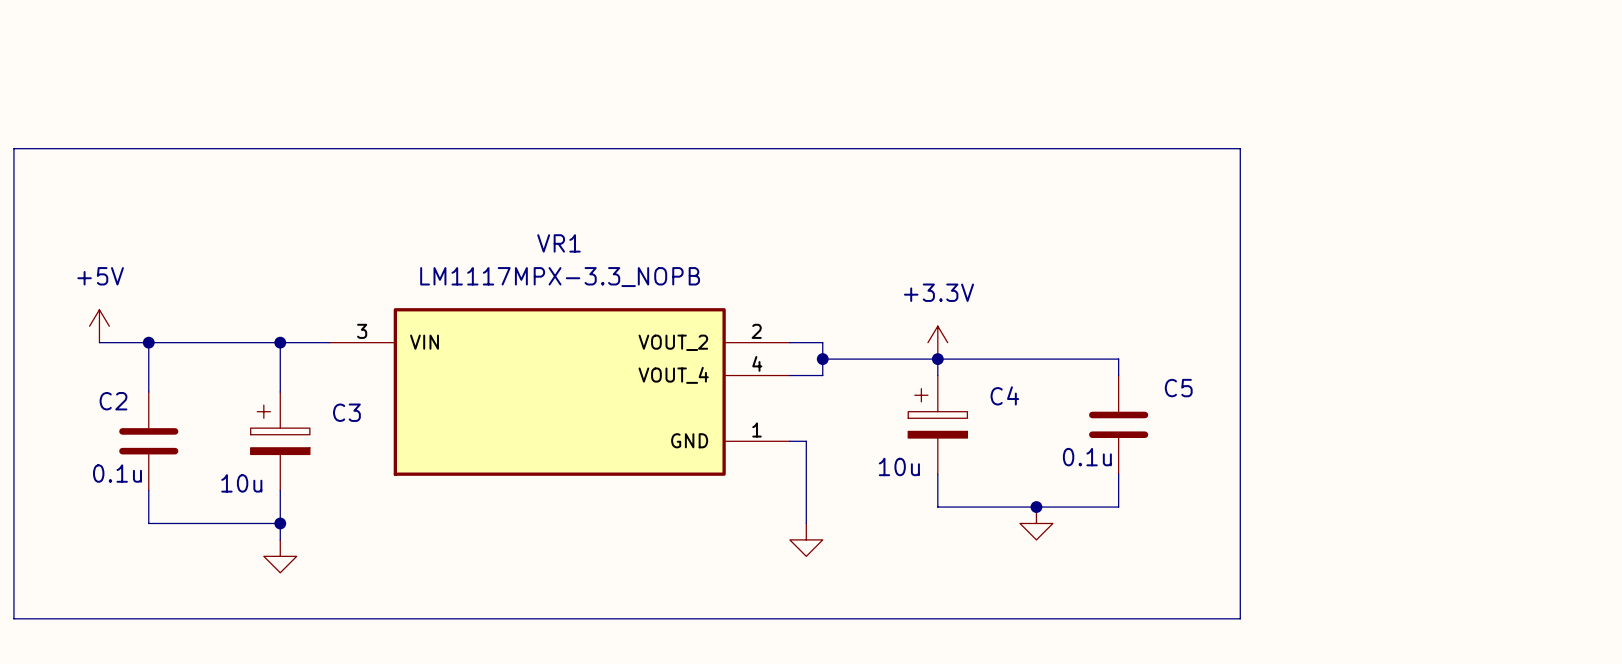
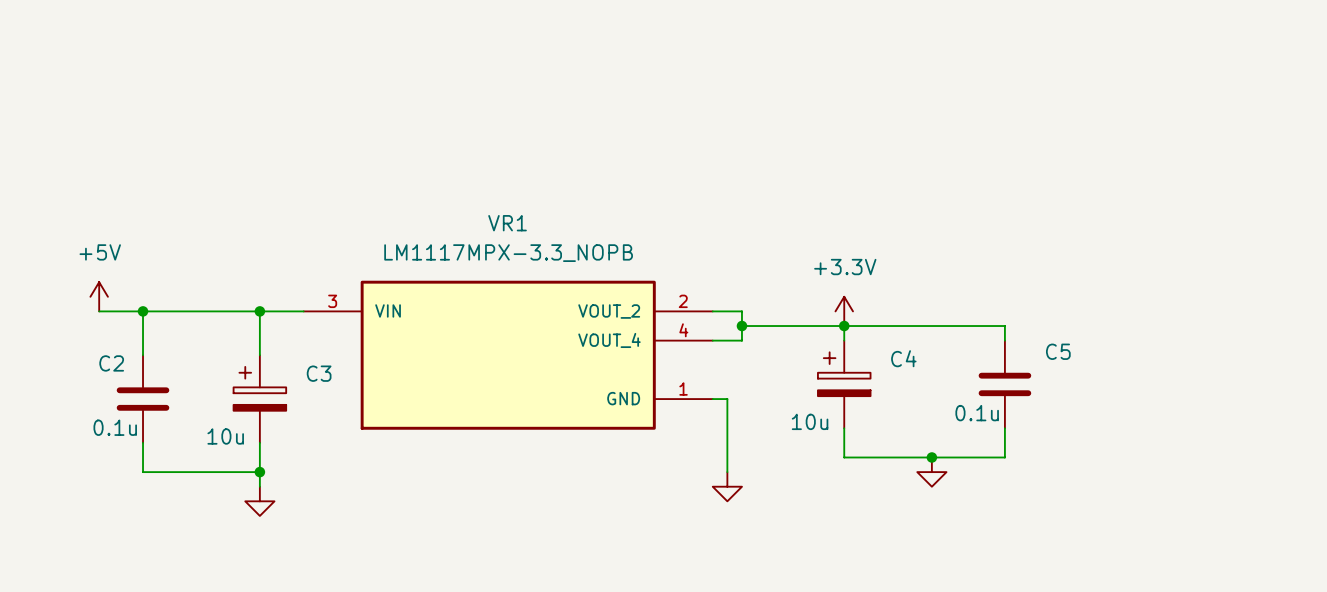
line: (13, 148) (1240, 148) (1240, 618) (13, 618) (13, 148) -> none

